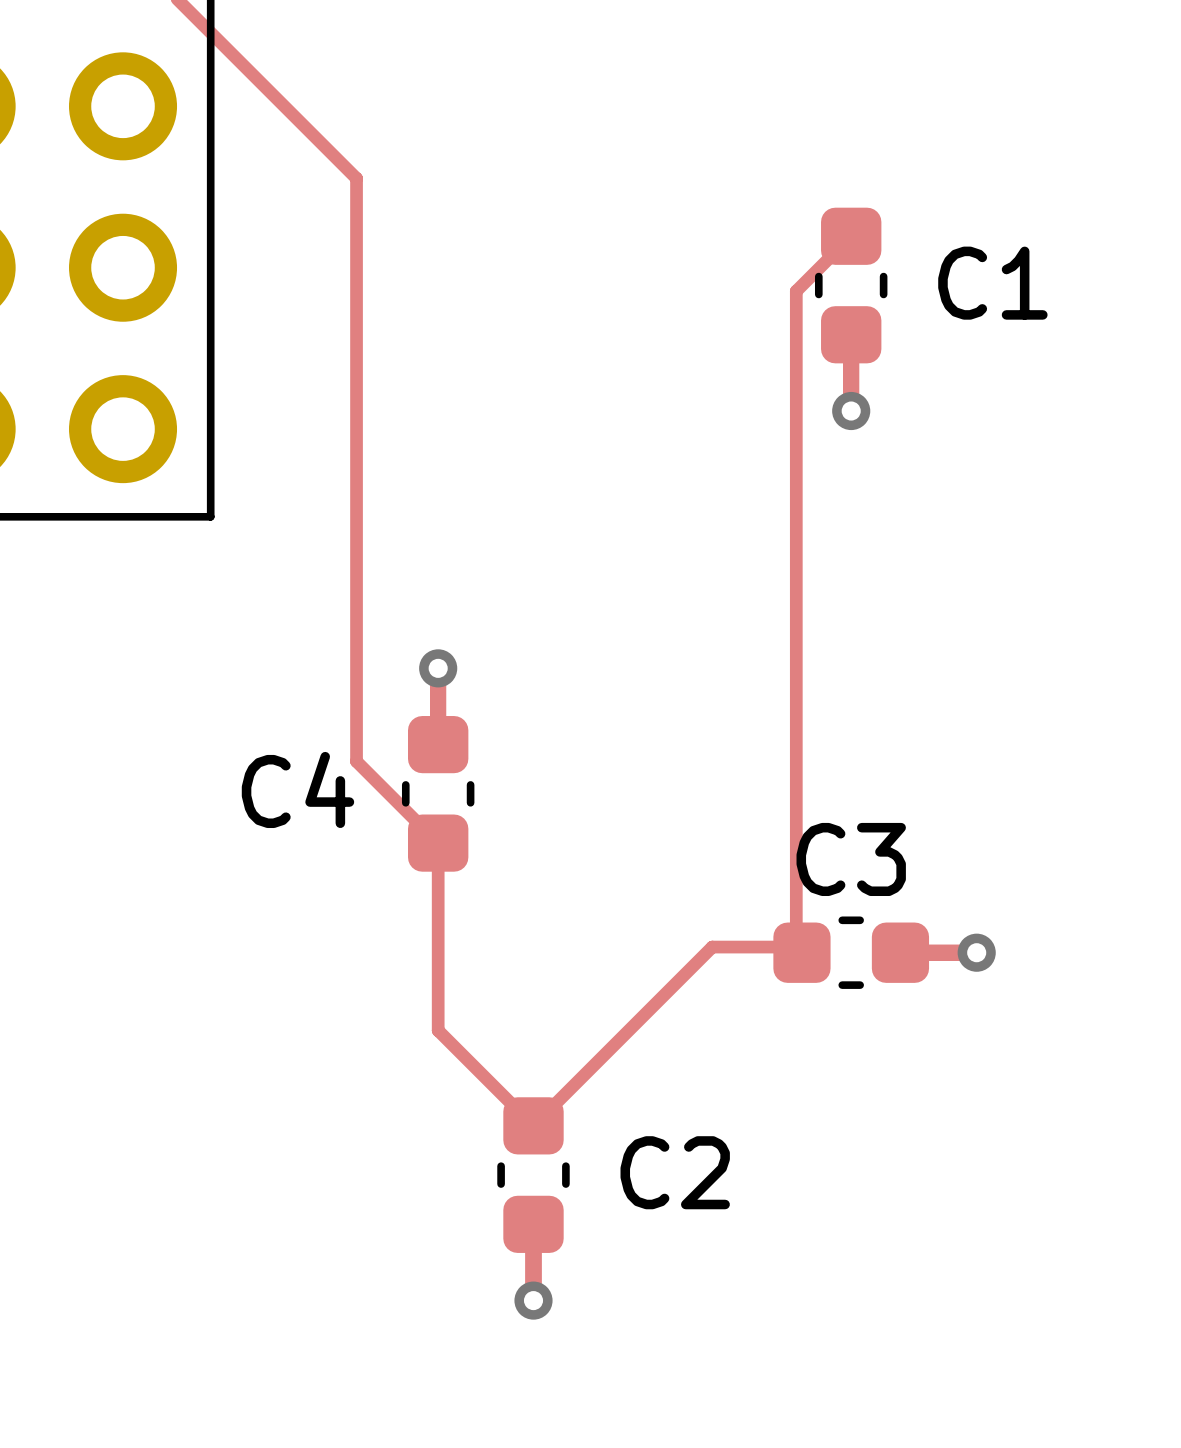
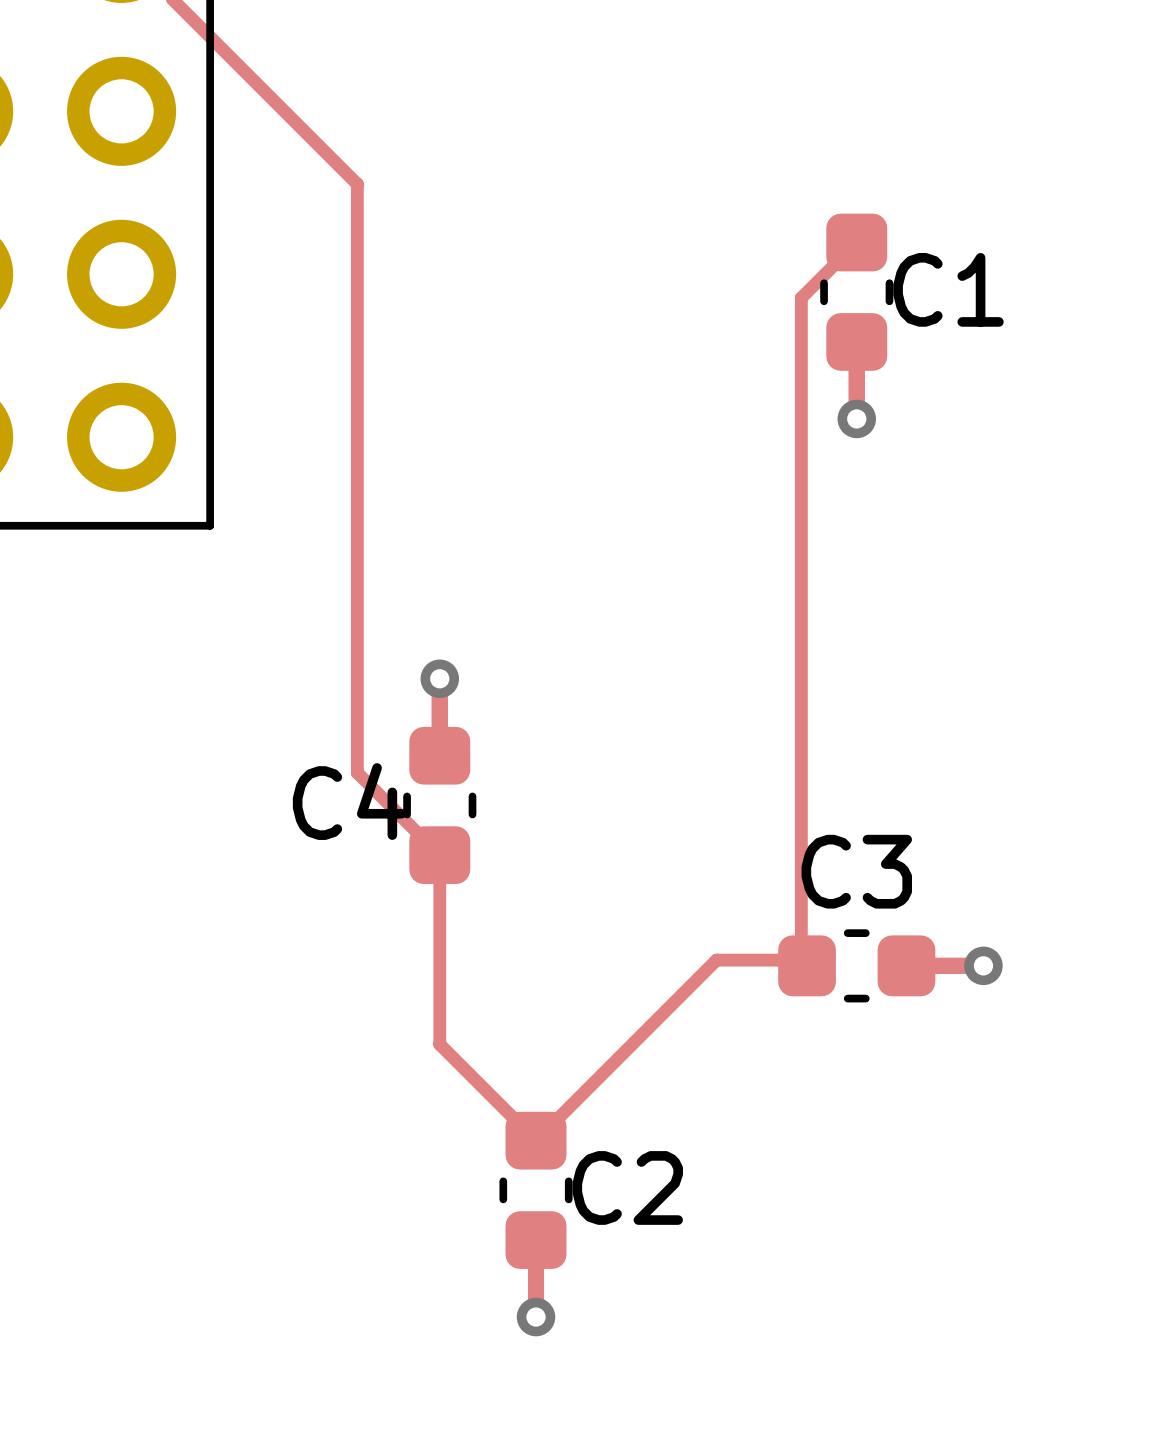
C1 name position: C1 (992, 283) -> C1 (948, 289)
C4 name position: C4 (298, 789) -> C4 (349, 801)
C2 name position: C2 (675, 1172) -> C2 (627, 1187)

